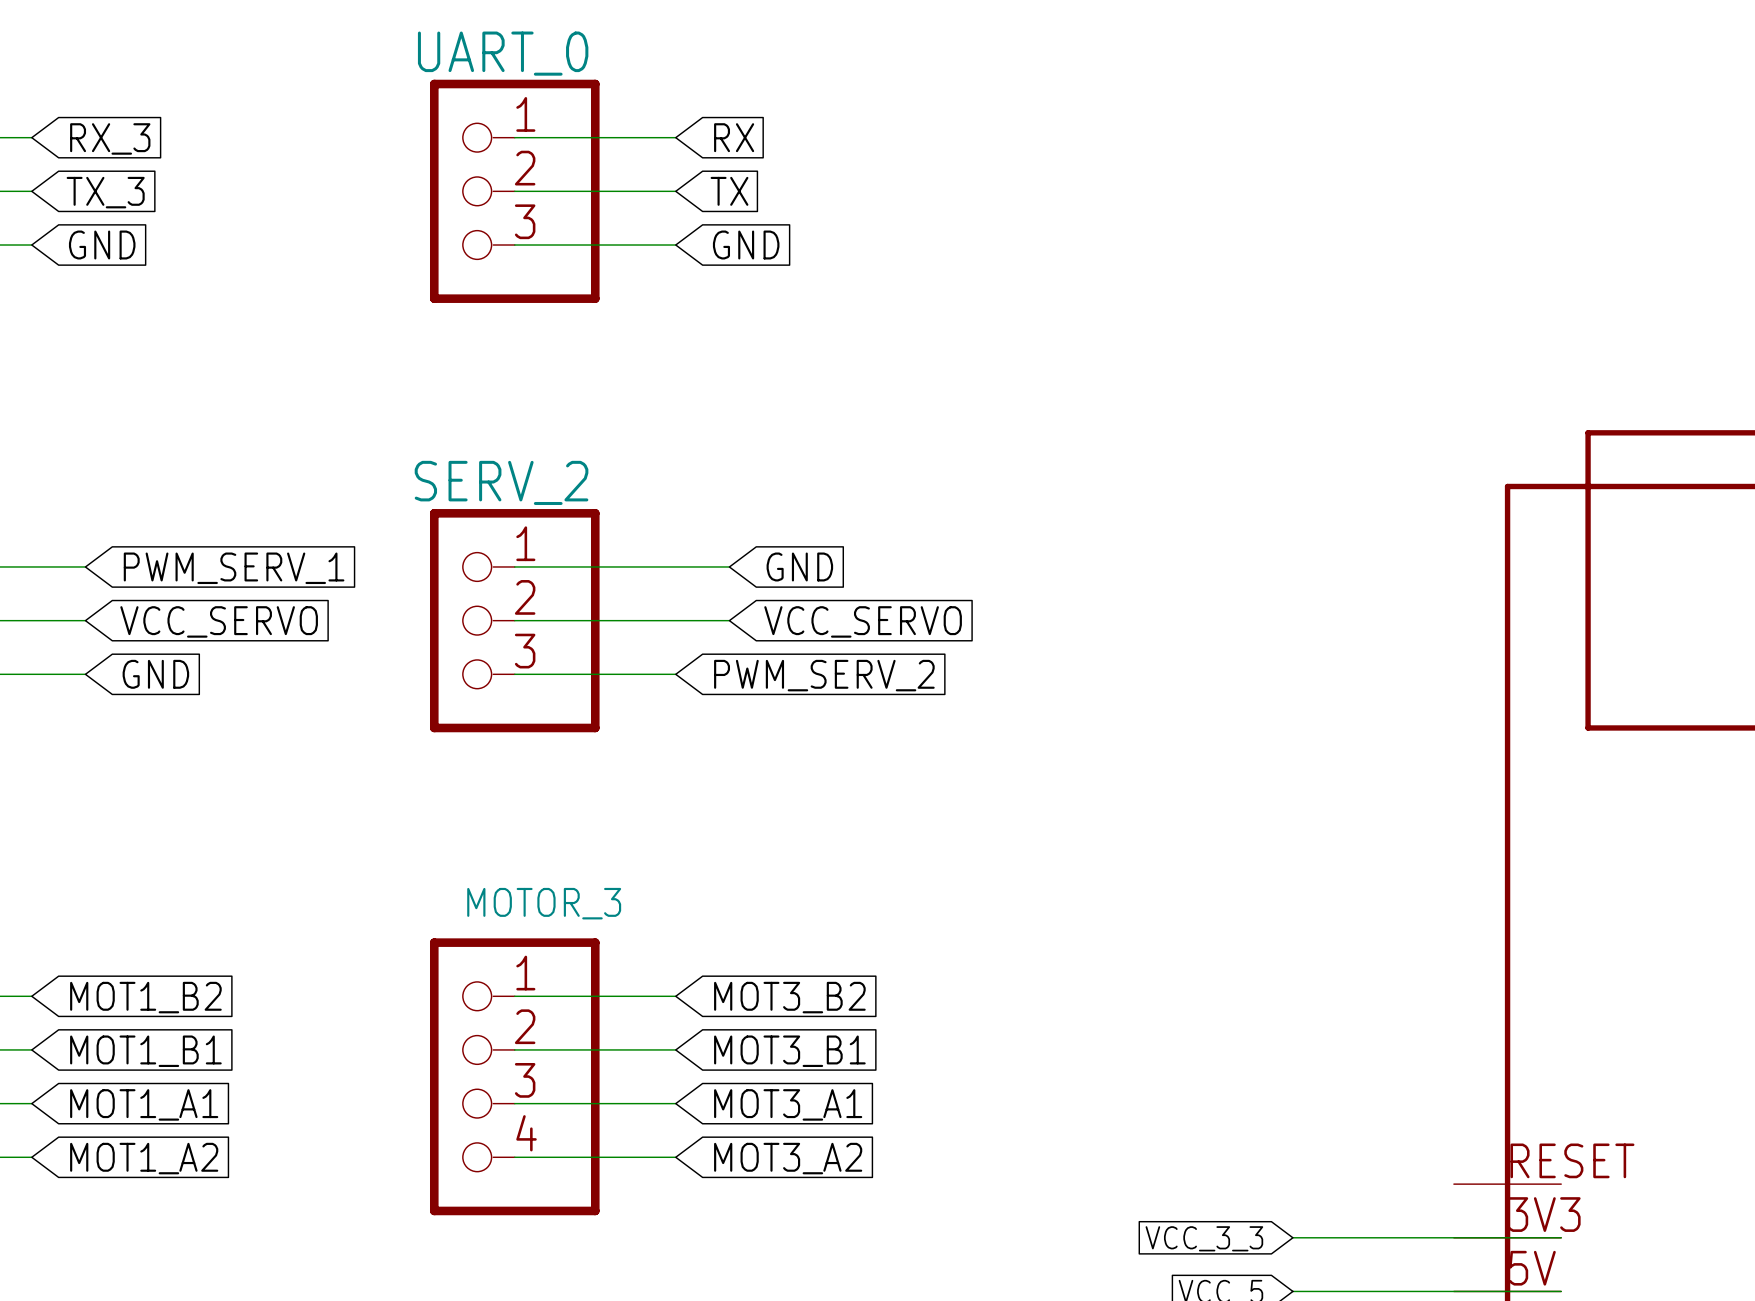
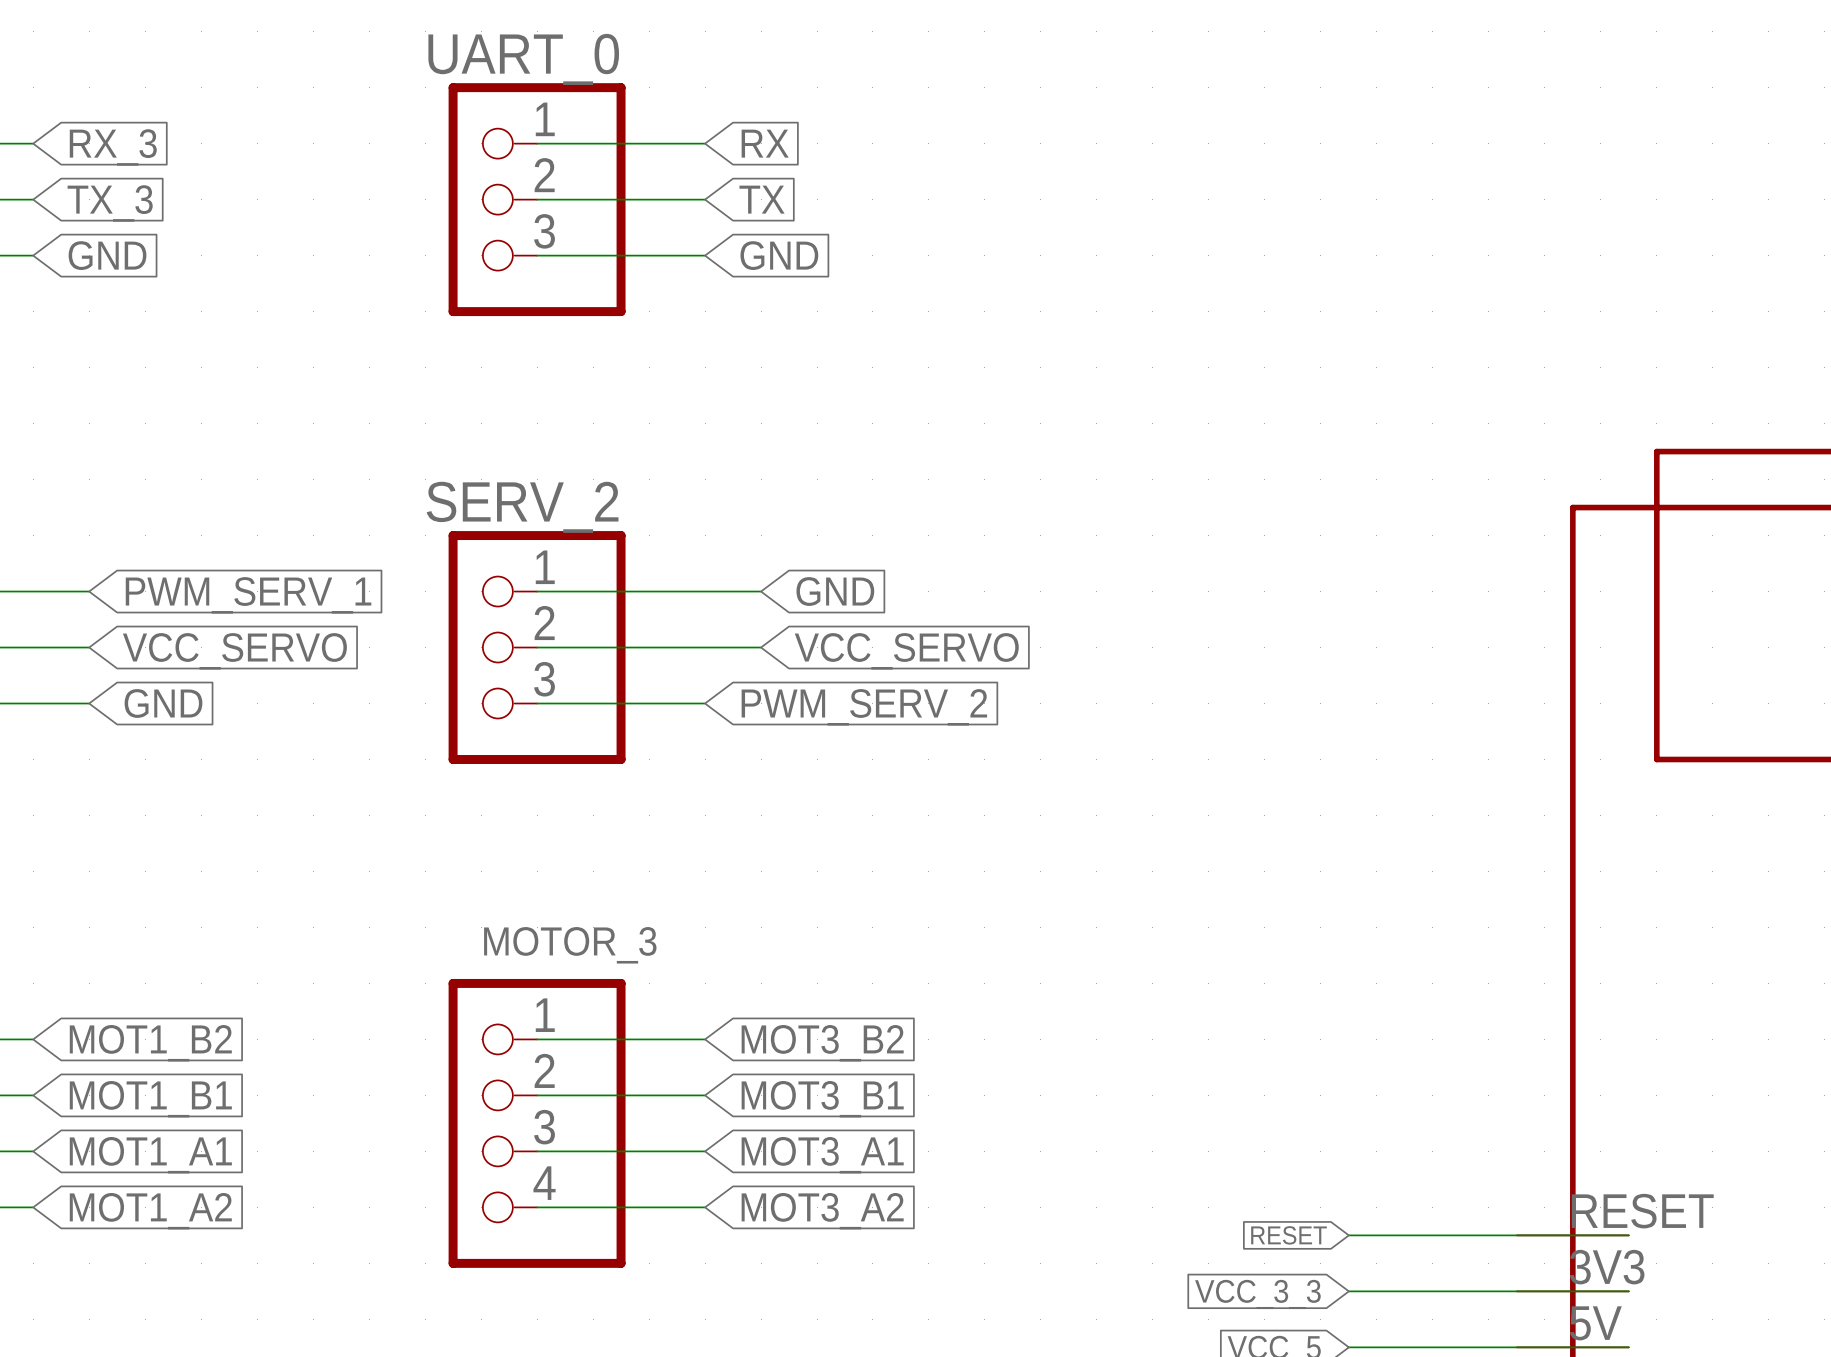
global label: none -> RESET (1289, 1235)
wire: none -> (1348, 1235) (1628, 1235)

